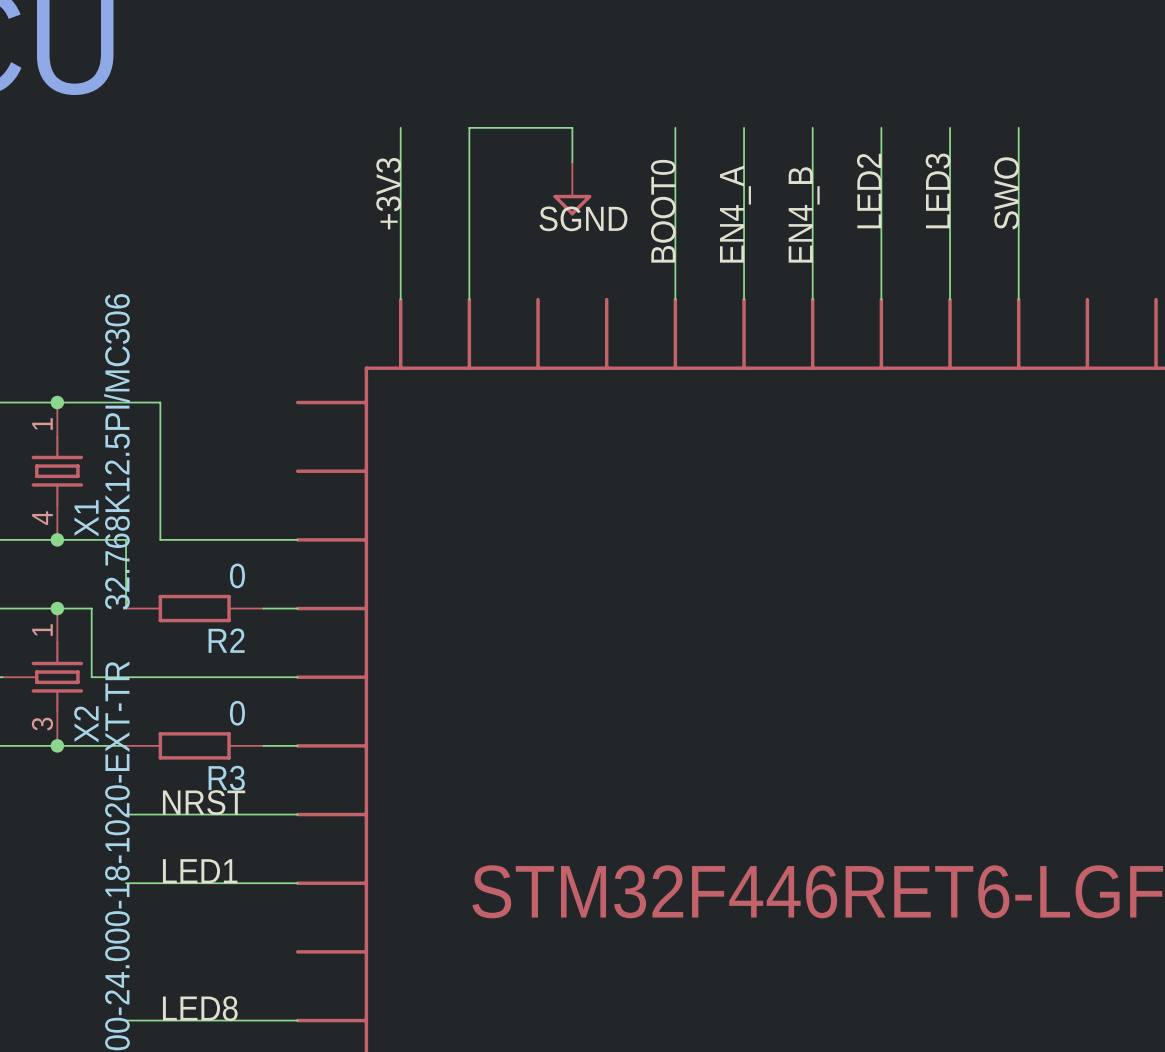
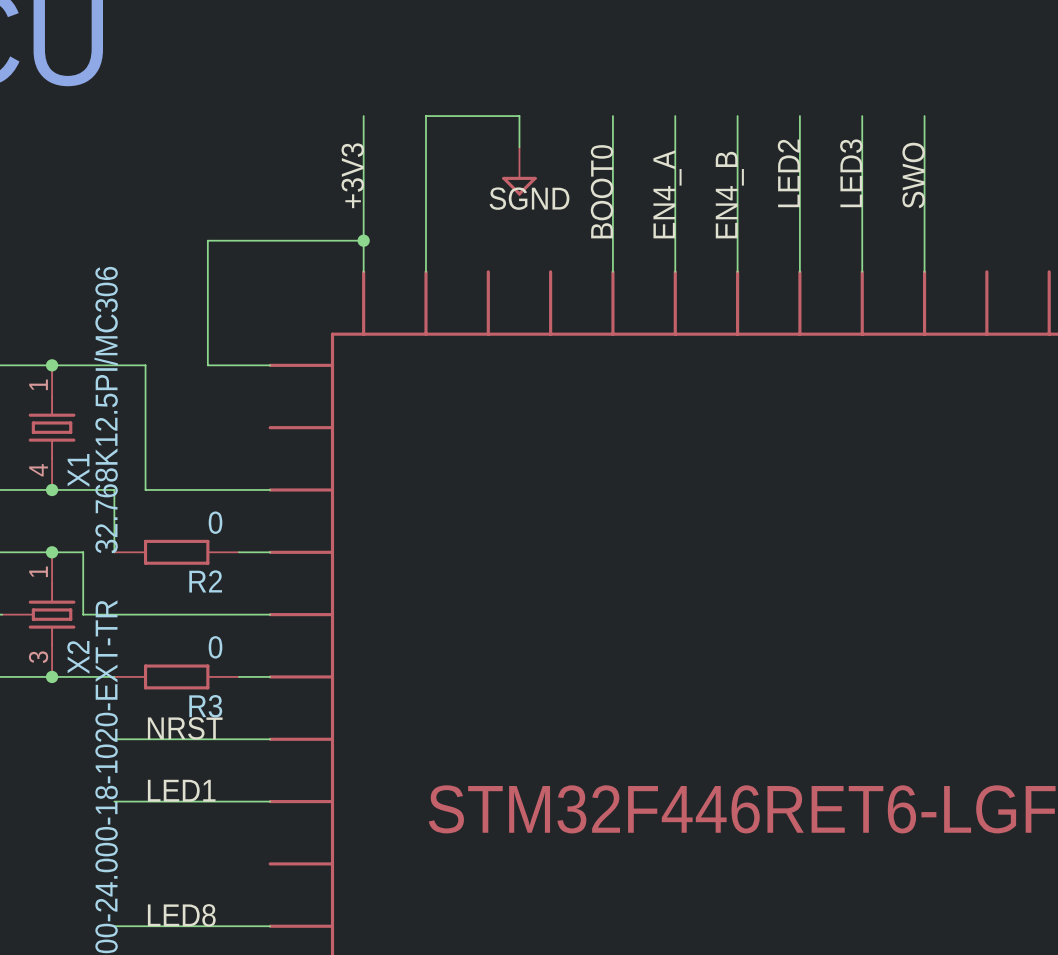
wire: none -> (363, 240) (207, 240) (207, 365) (270, 365)
junction: none -> (363, 240)

